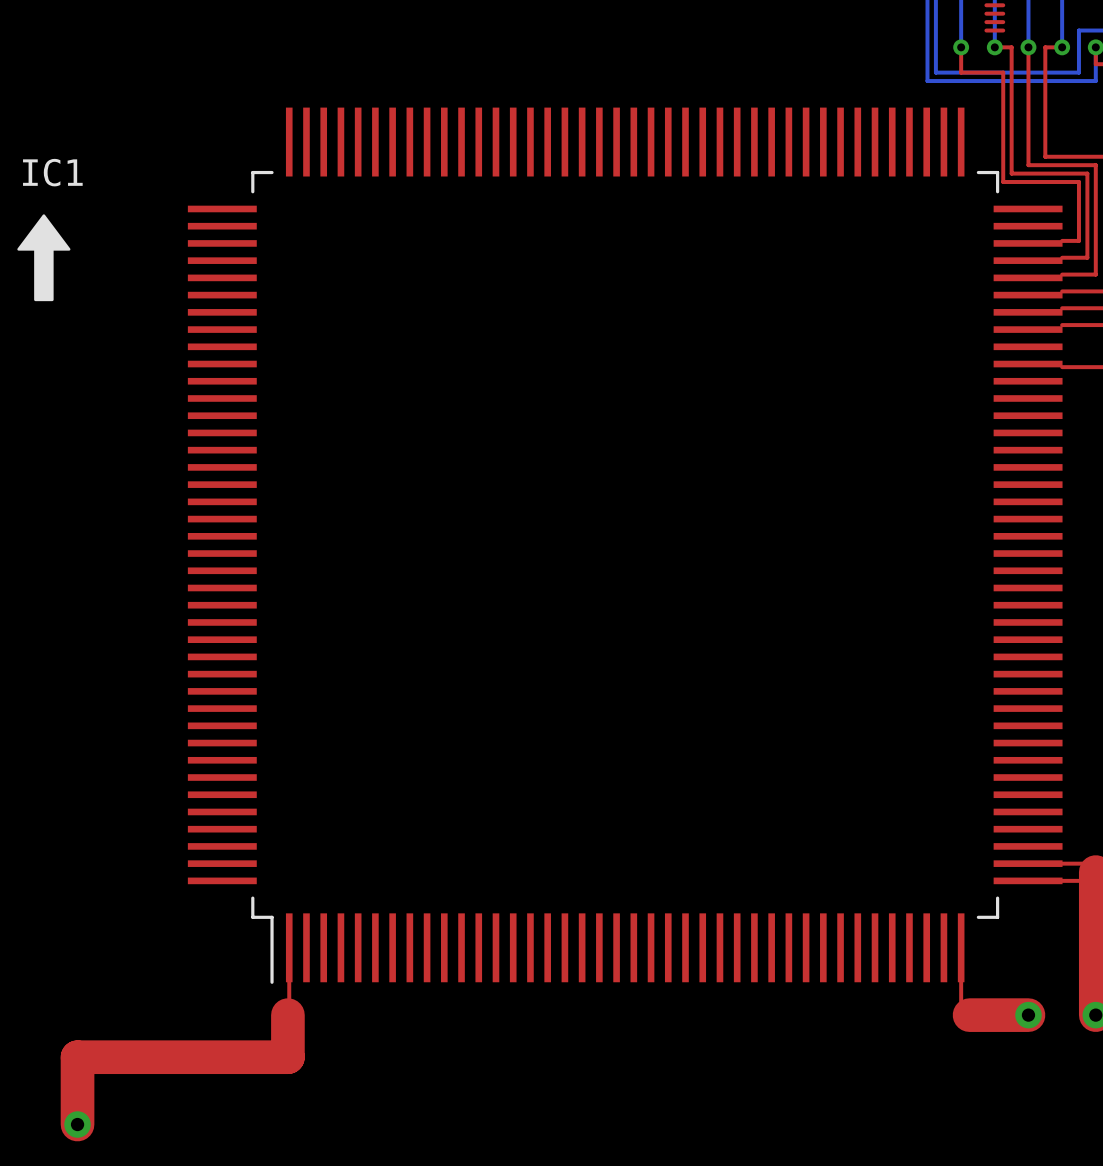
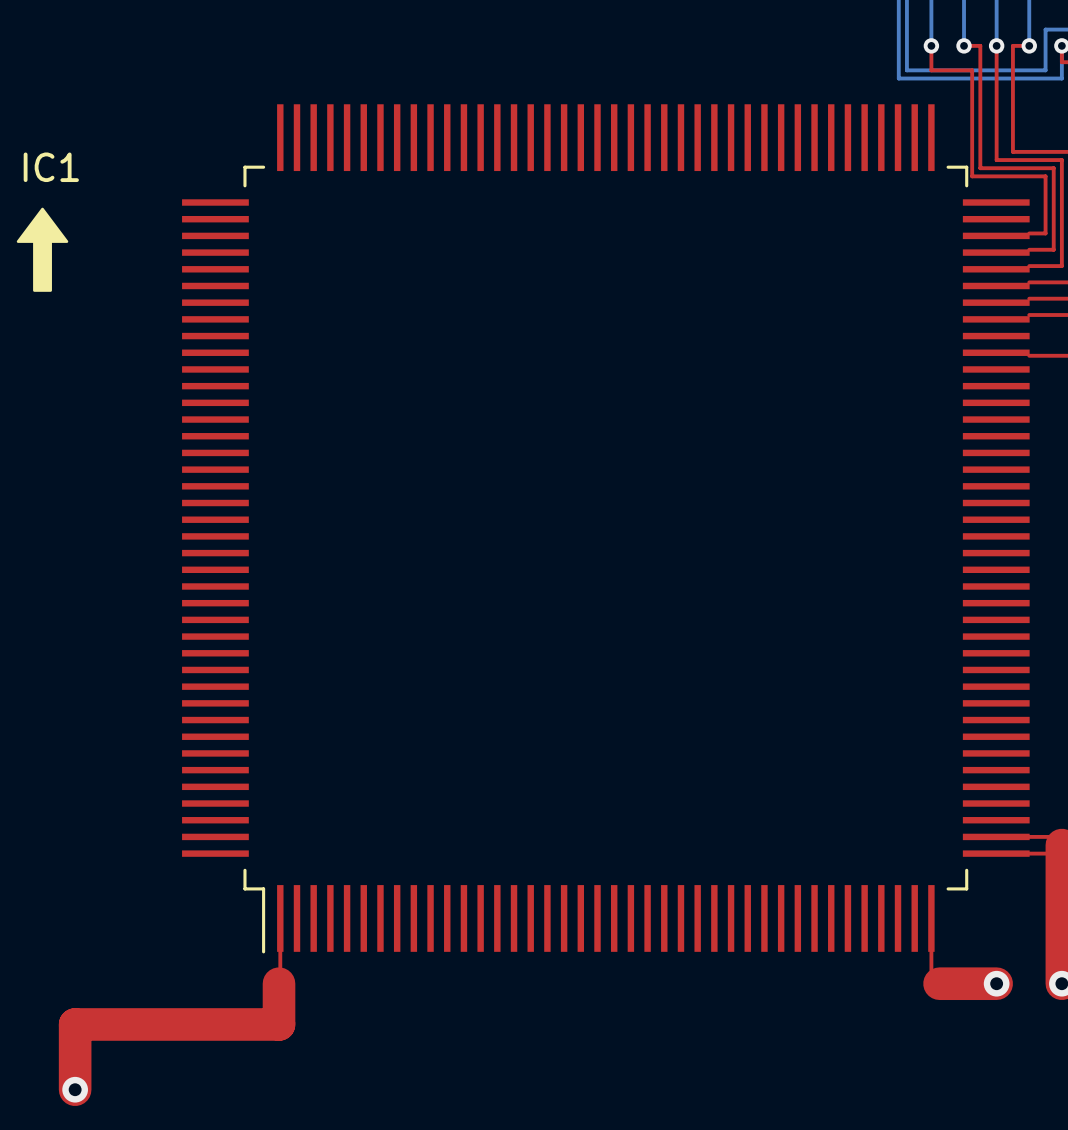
top track: (986, 5) (1003, 5) -> none
top track: (986, 13) (1003, 13) -> none
top track: (986, 22) (1003, 22) -> none
top track: (986, 30) (1003, 30) -> none

